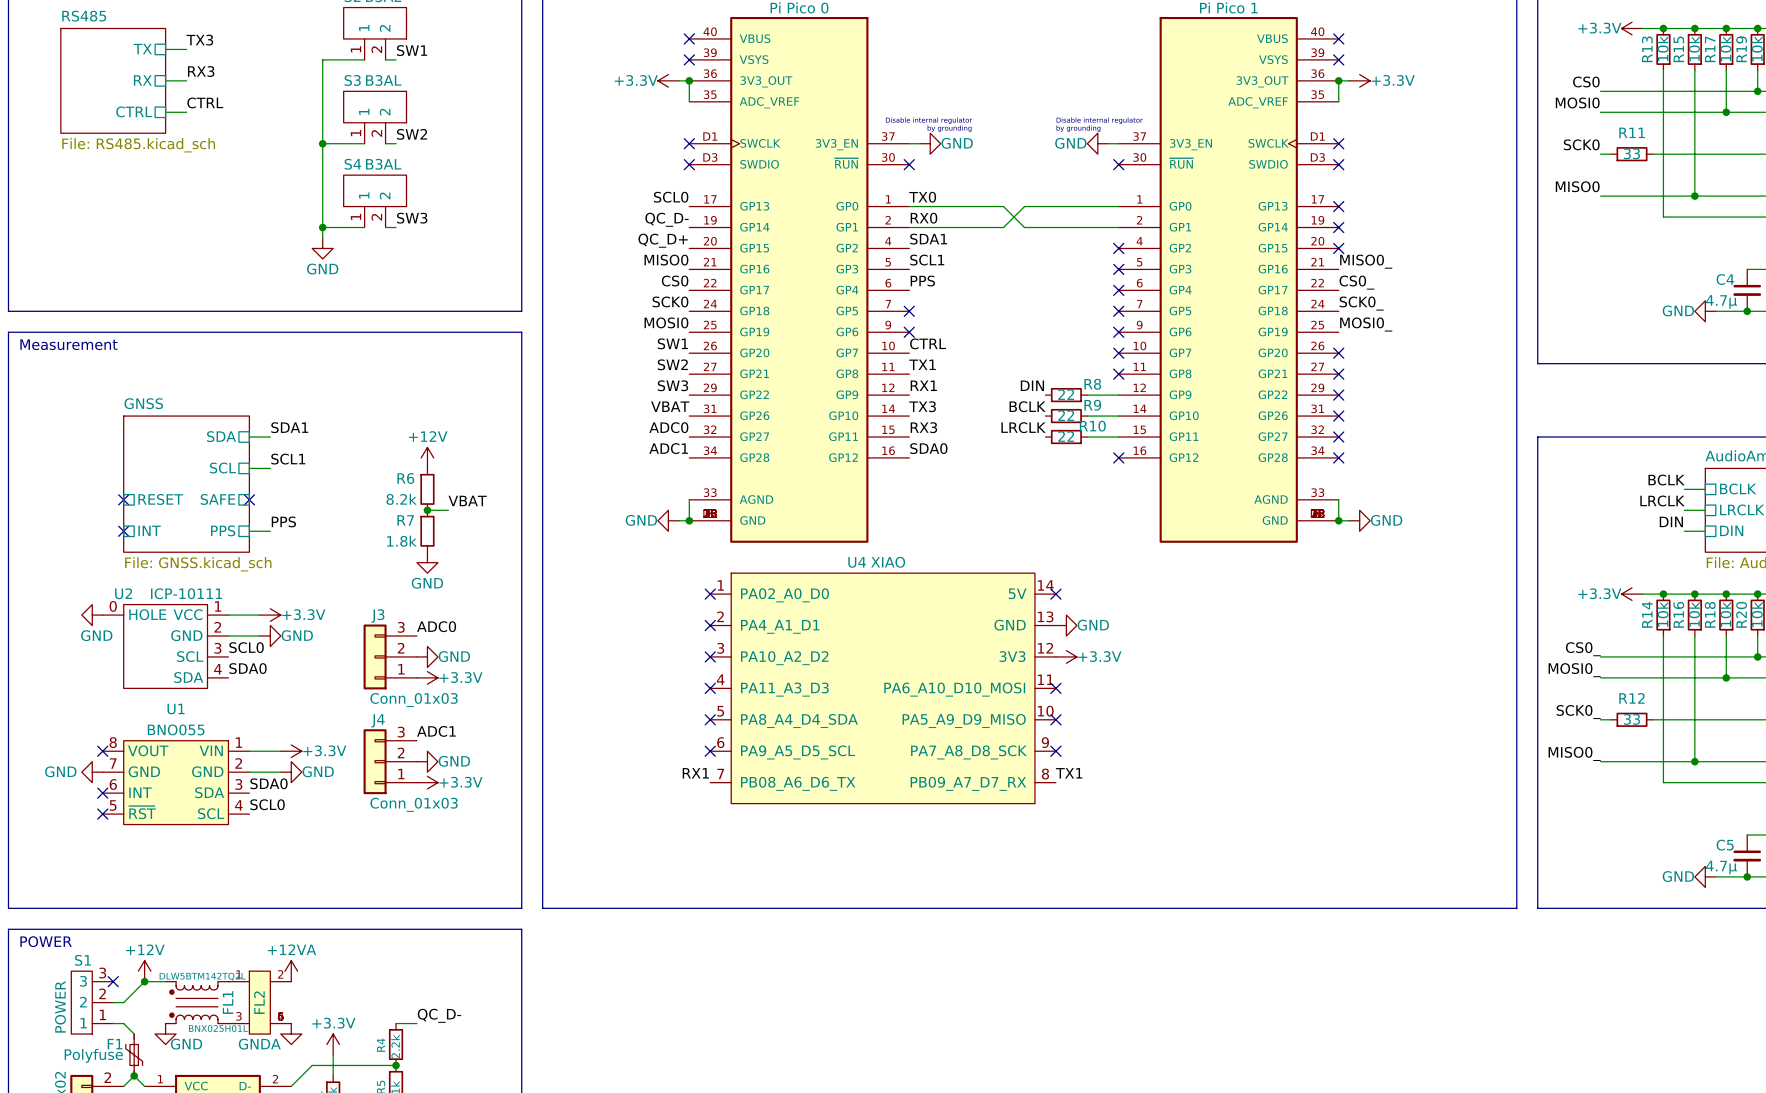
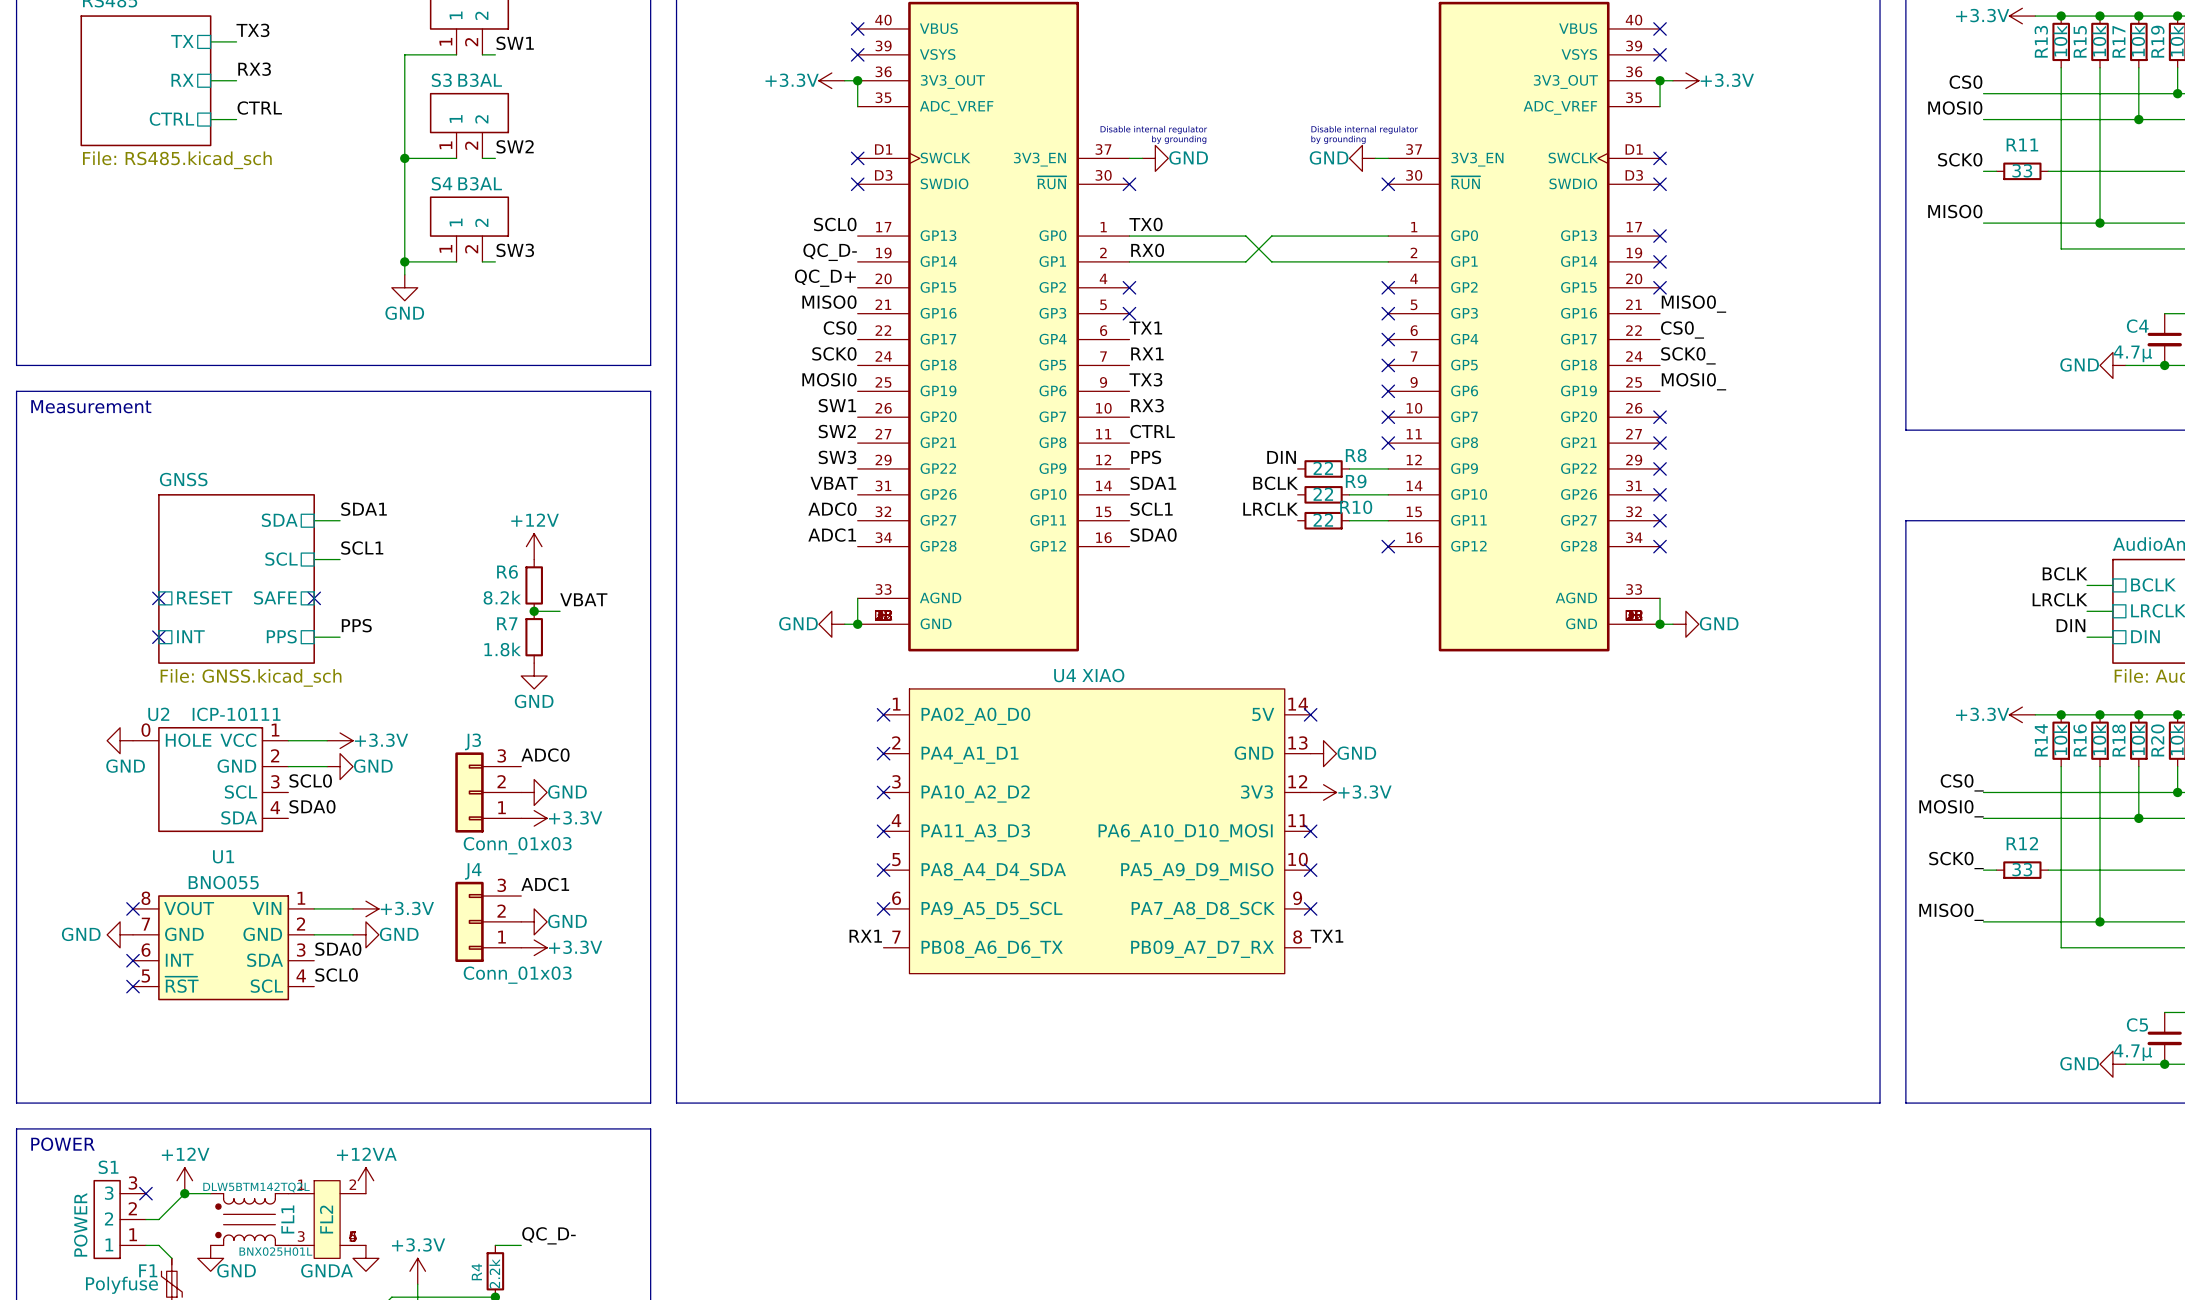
label: SDA1 (928, 239) -> none
no-connect mark: none -> (1129, 287)
label: SCL1 (927, 260) -> none
no-connect mark: none -> (1129, 313)
label: PPS (922, 281) -> TX1 (1145, 328)
label: none -> RX1 (1147, 353)
no-connect mark: (909, 311) -> none
label: none -> TX3 (1145, 379)
no-connect mark: (909, 332) -> none
label: CTRL (928, 343) -> RX3 (1147, 405)
label: TX1 (922, 364) -> CTRL (1152, 431)
label: RX1 (923, 385) -> PPS (1146, 457)
label: TX3 (922, 406) -> SDA1 (1153, 483)
label: RX3 (923, 427) -> SCL1 (1151, 509)

